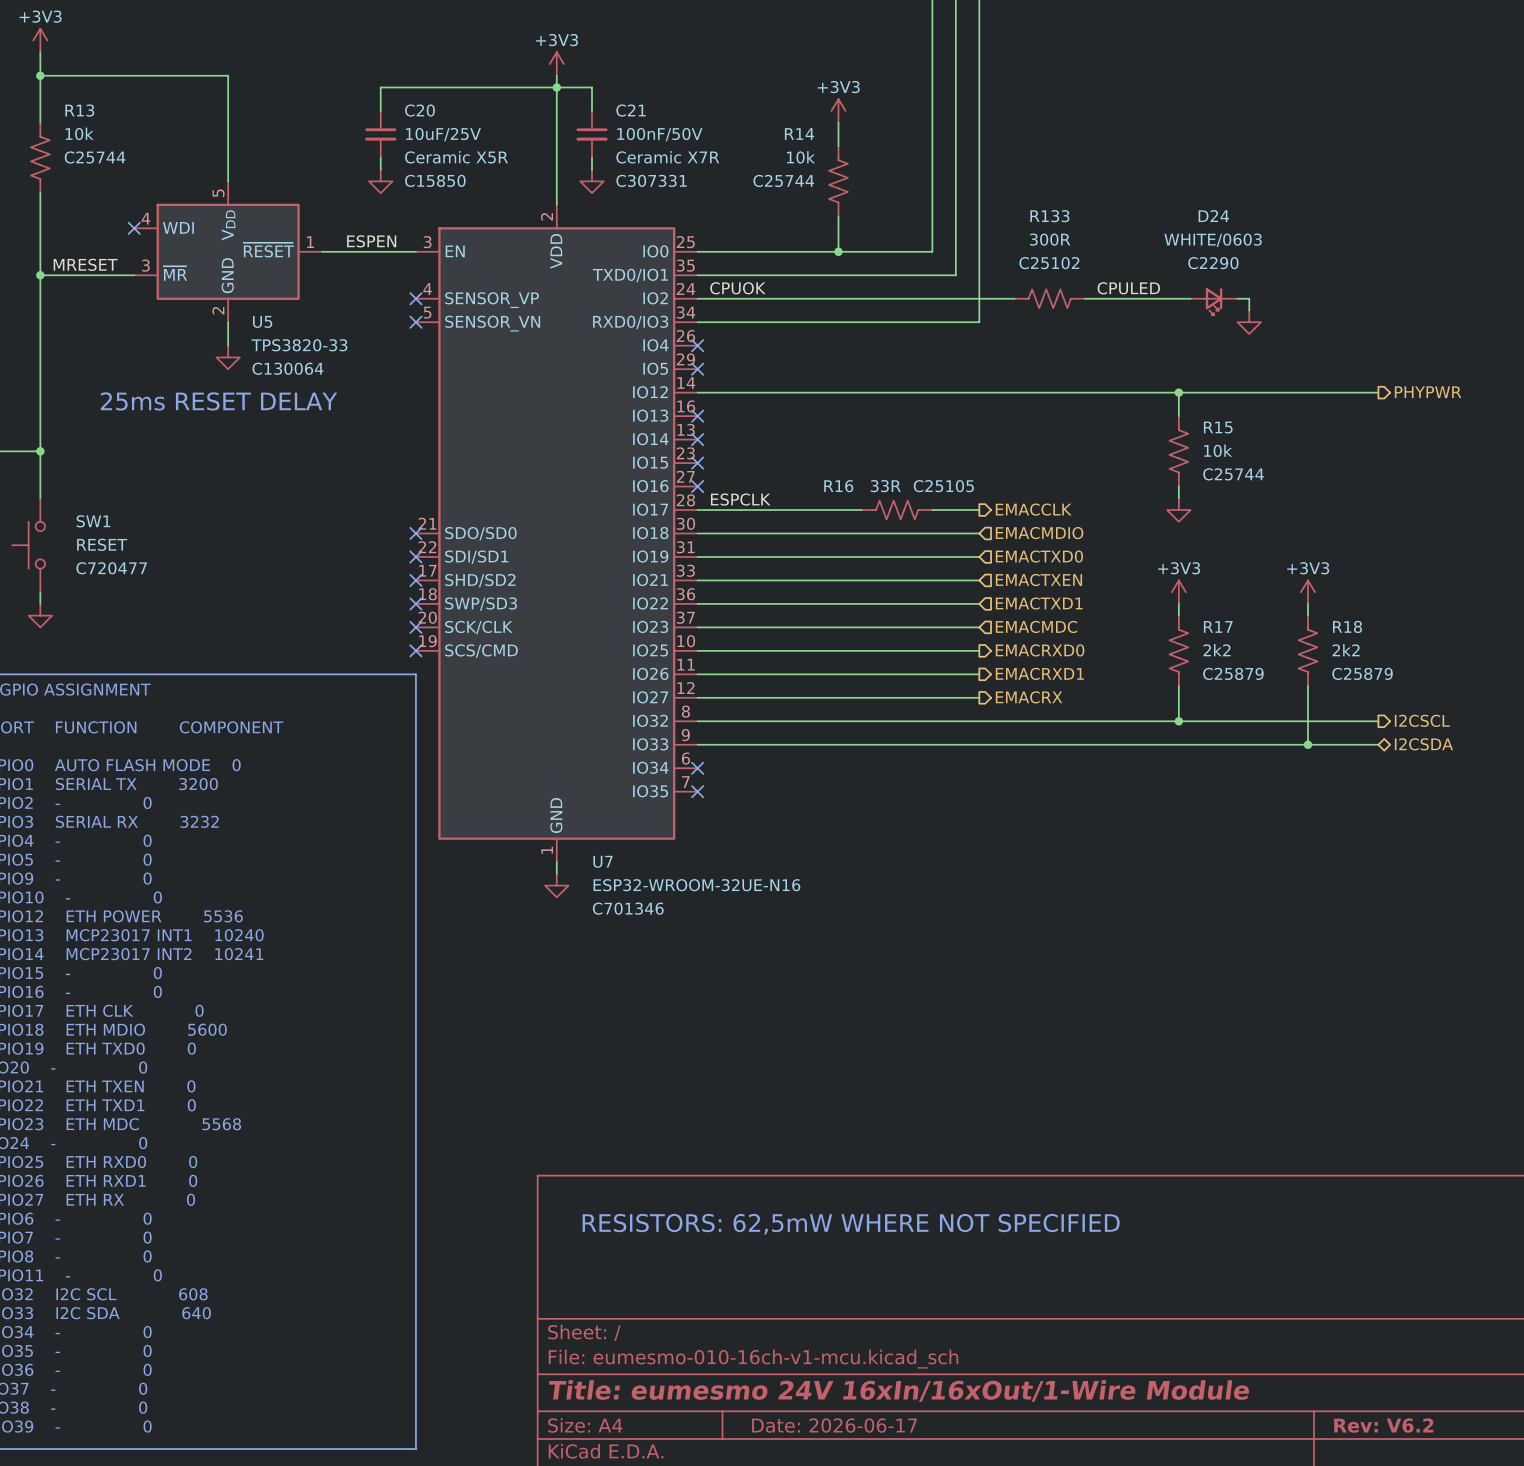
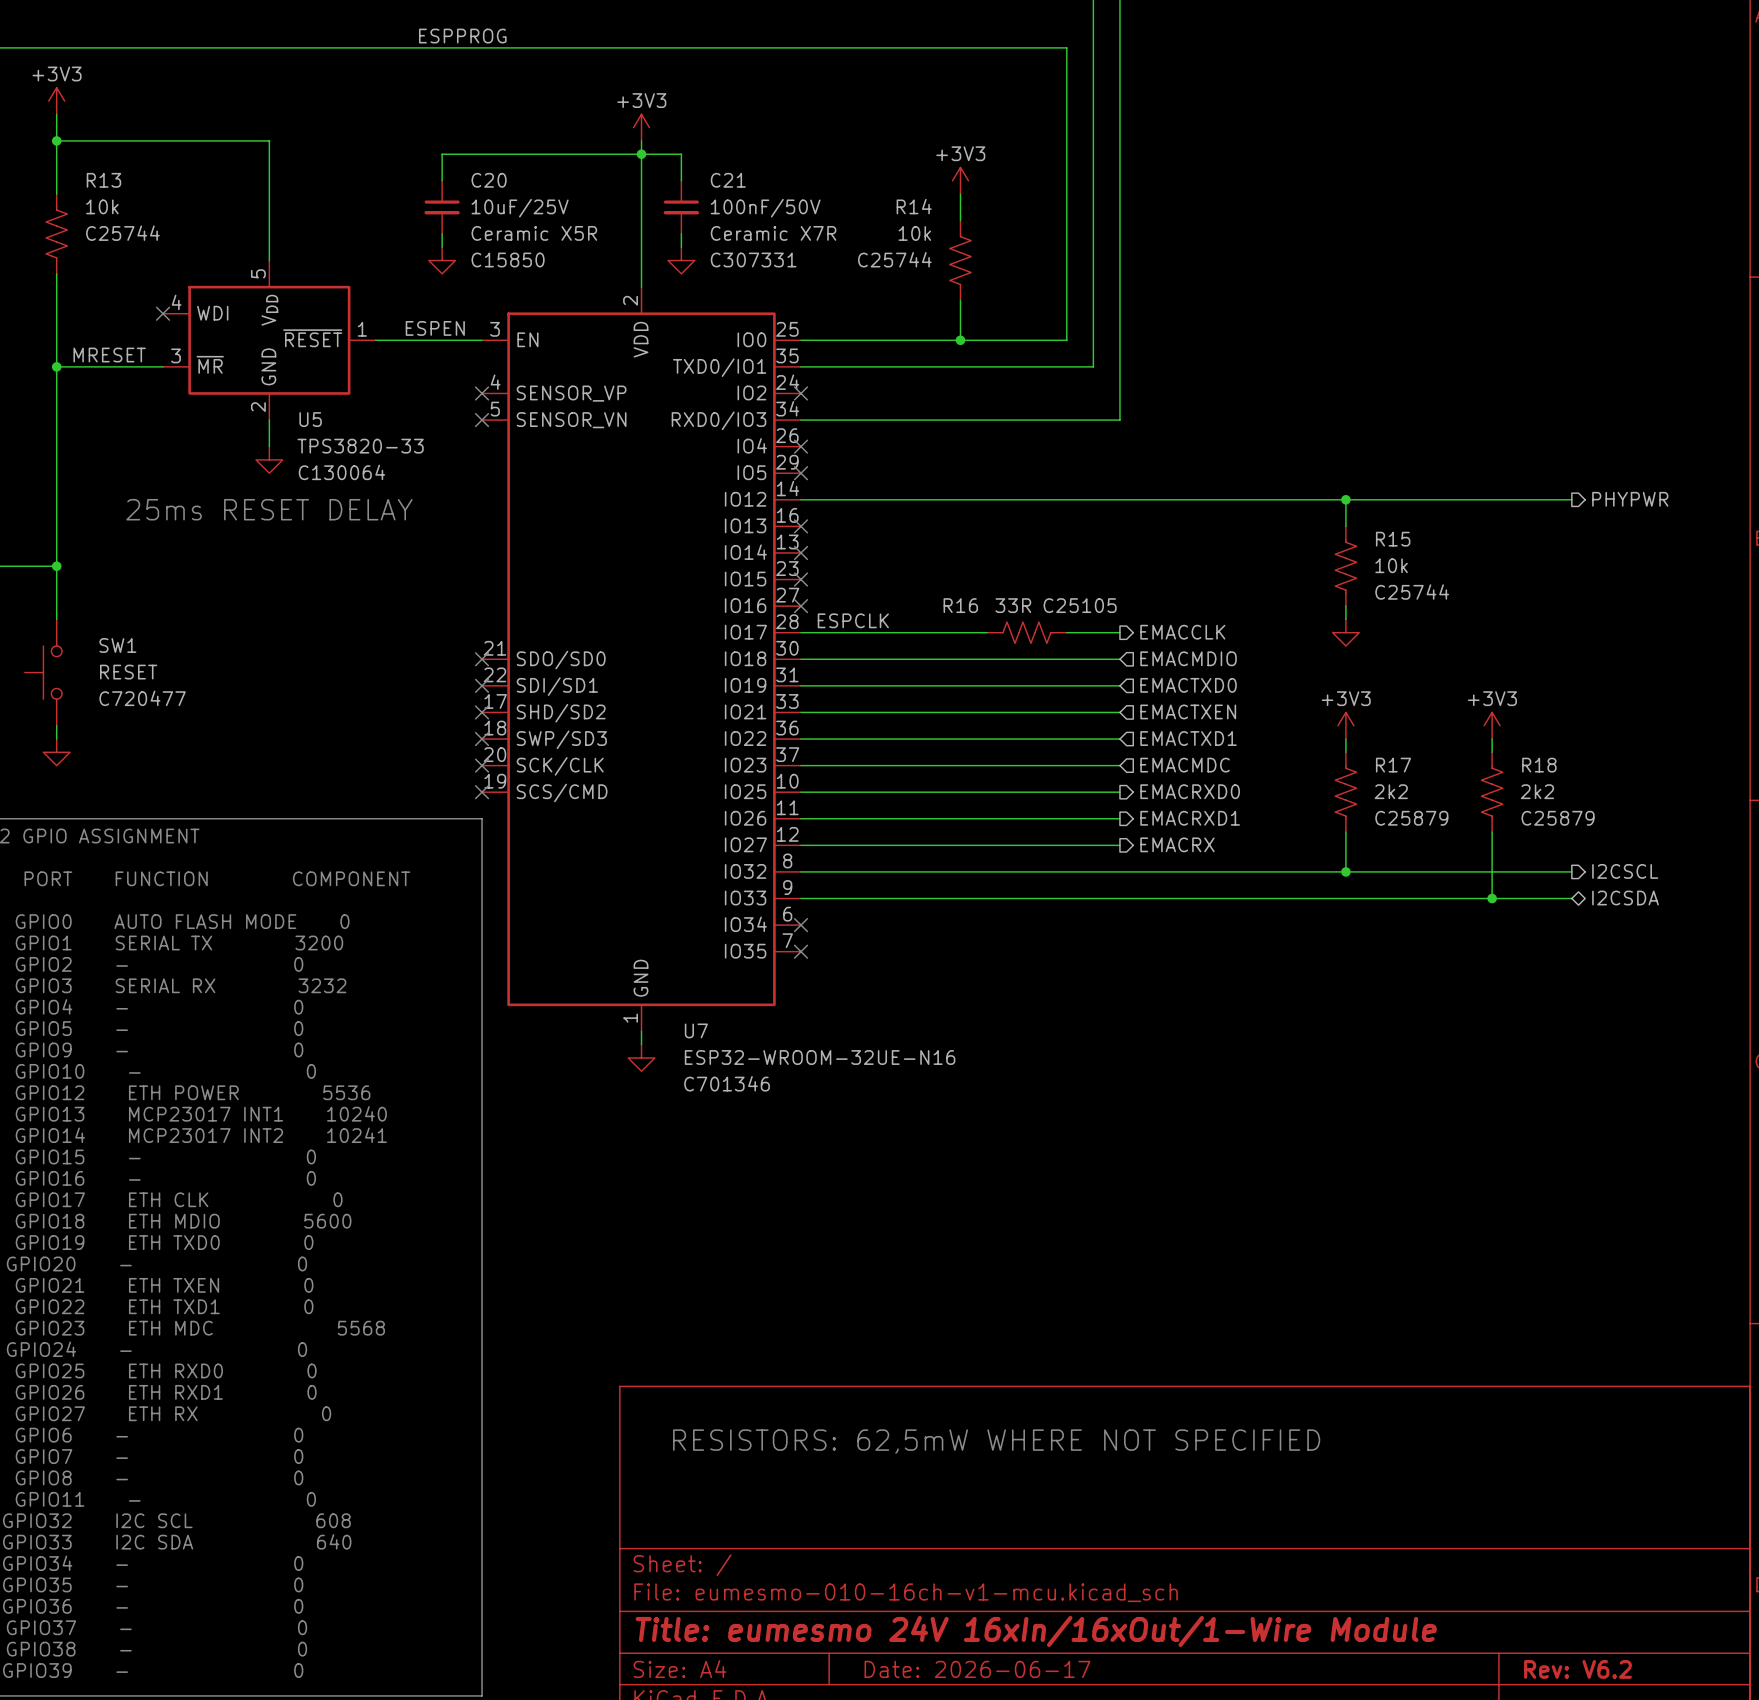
label: CPUOK (737, 288) -> none
label: CPULED (1128, 288) -> none
wire: (697, 298) (1014, 298) -> none
no-connect mark: none -> (800, 393)
R133: 300R (1049, 298) -> none
wire: (1084, 298) (1190, 298) -> none
wire: (1237, 298) (1249, 298) (1249, 310) -> none
D24: WHITE/0603 (1214, 301) -> none
power symbol: (1249, 322) -> none

